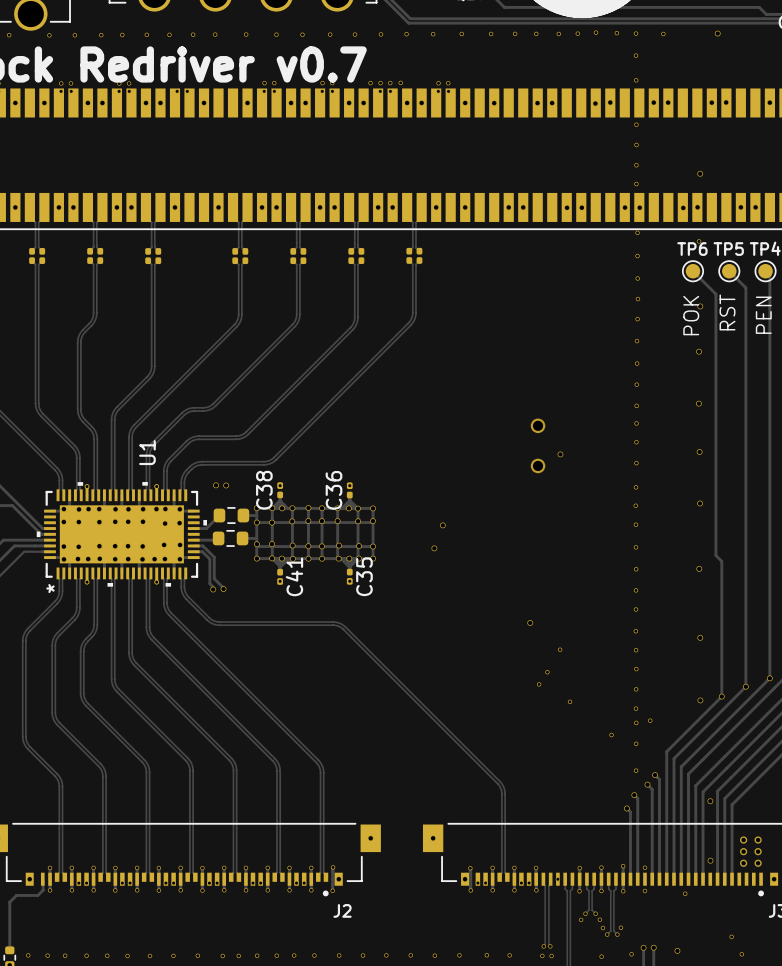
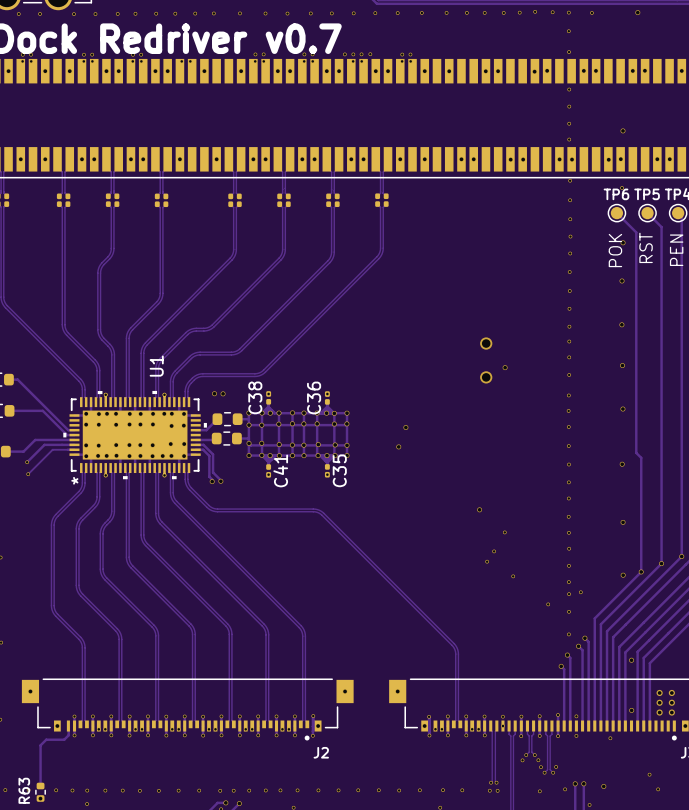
via: none -> (502, 716)

